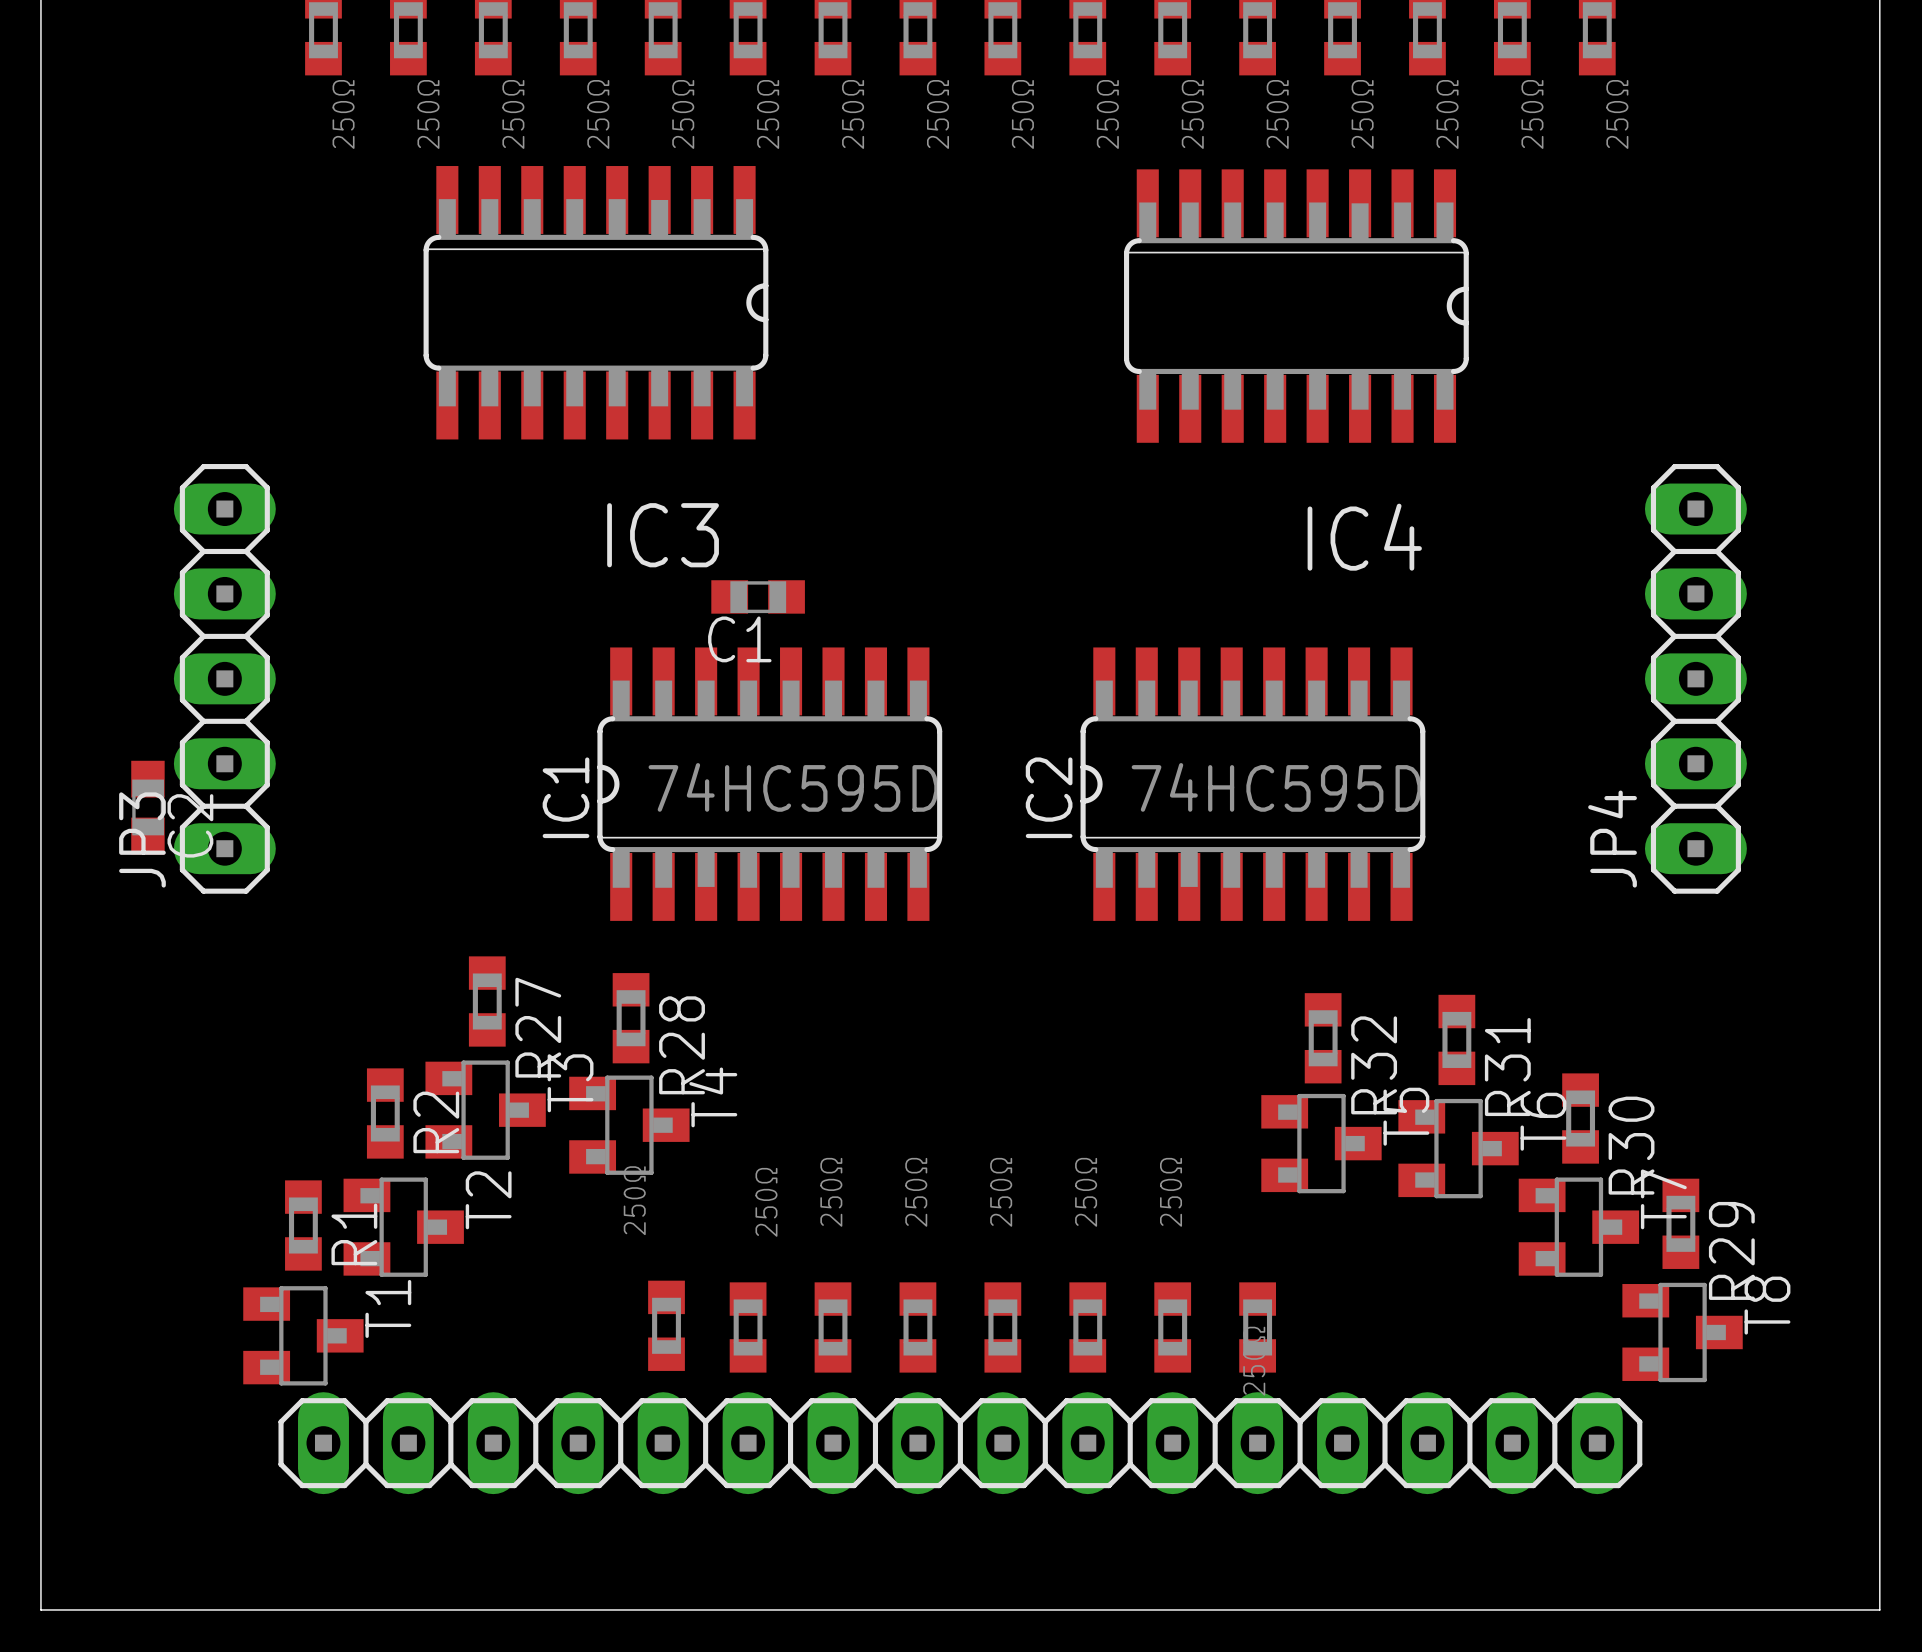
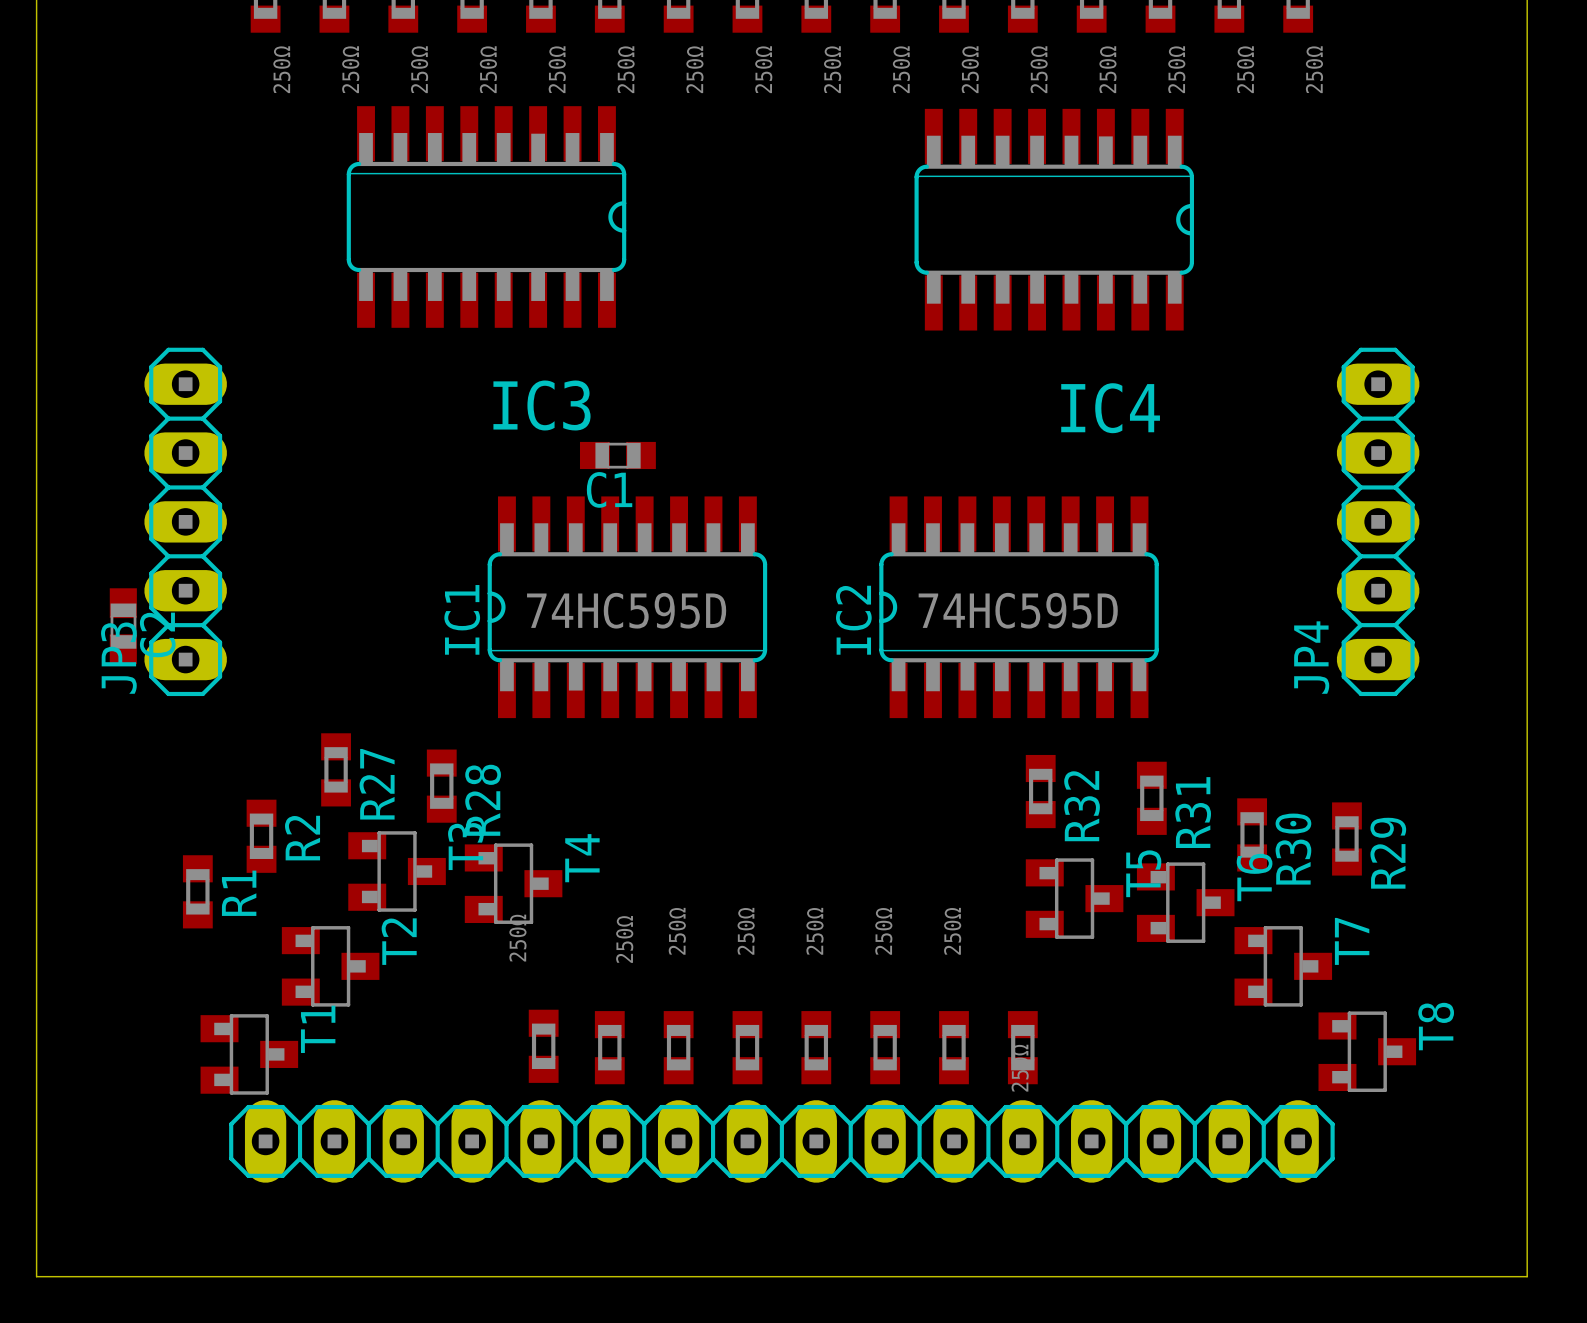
R27 position: (487, 1001) -> (336, 769)
R28 position: (631, 1018) -> (441, 786)
R32 position: (1323, 1038) -> (1040, 791)
R31 position: (1456, 1039) -> (1151, 798)
R2 position: (385, 1113) -> (261, 836)
R30 position: (1580, 1118) -> (1252, 834)
R29 position: (1680, 1223) -> (1346, 838)
R1 position: (303, 1225) -> (197, 891)

